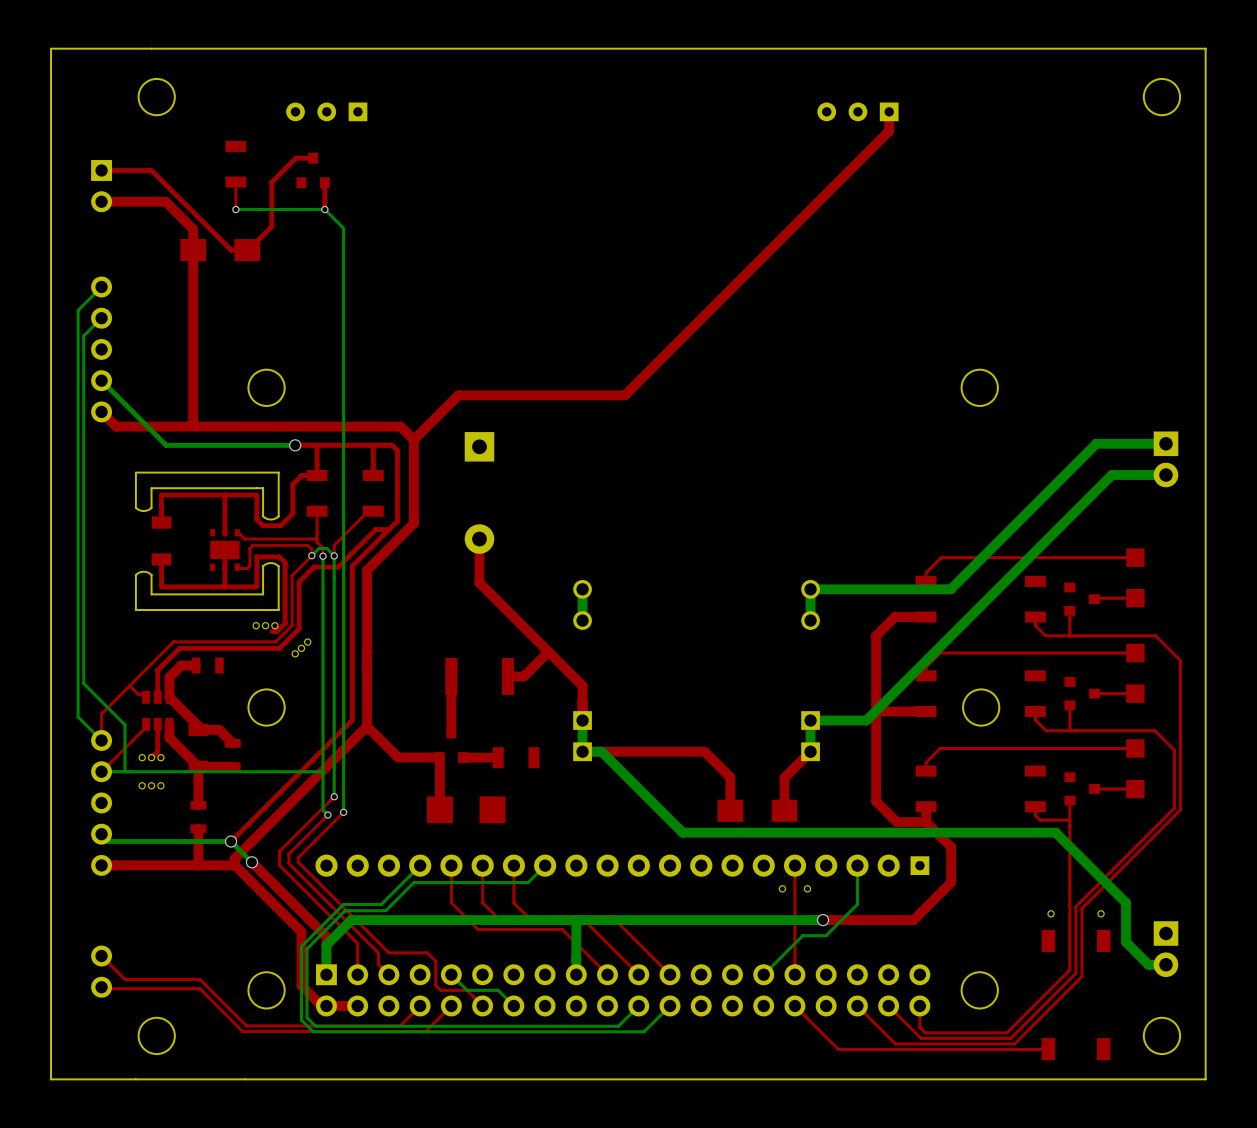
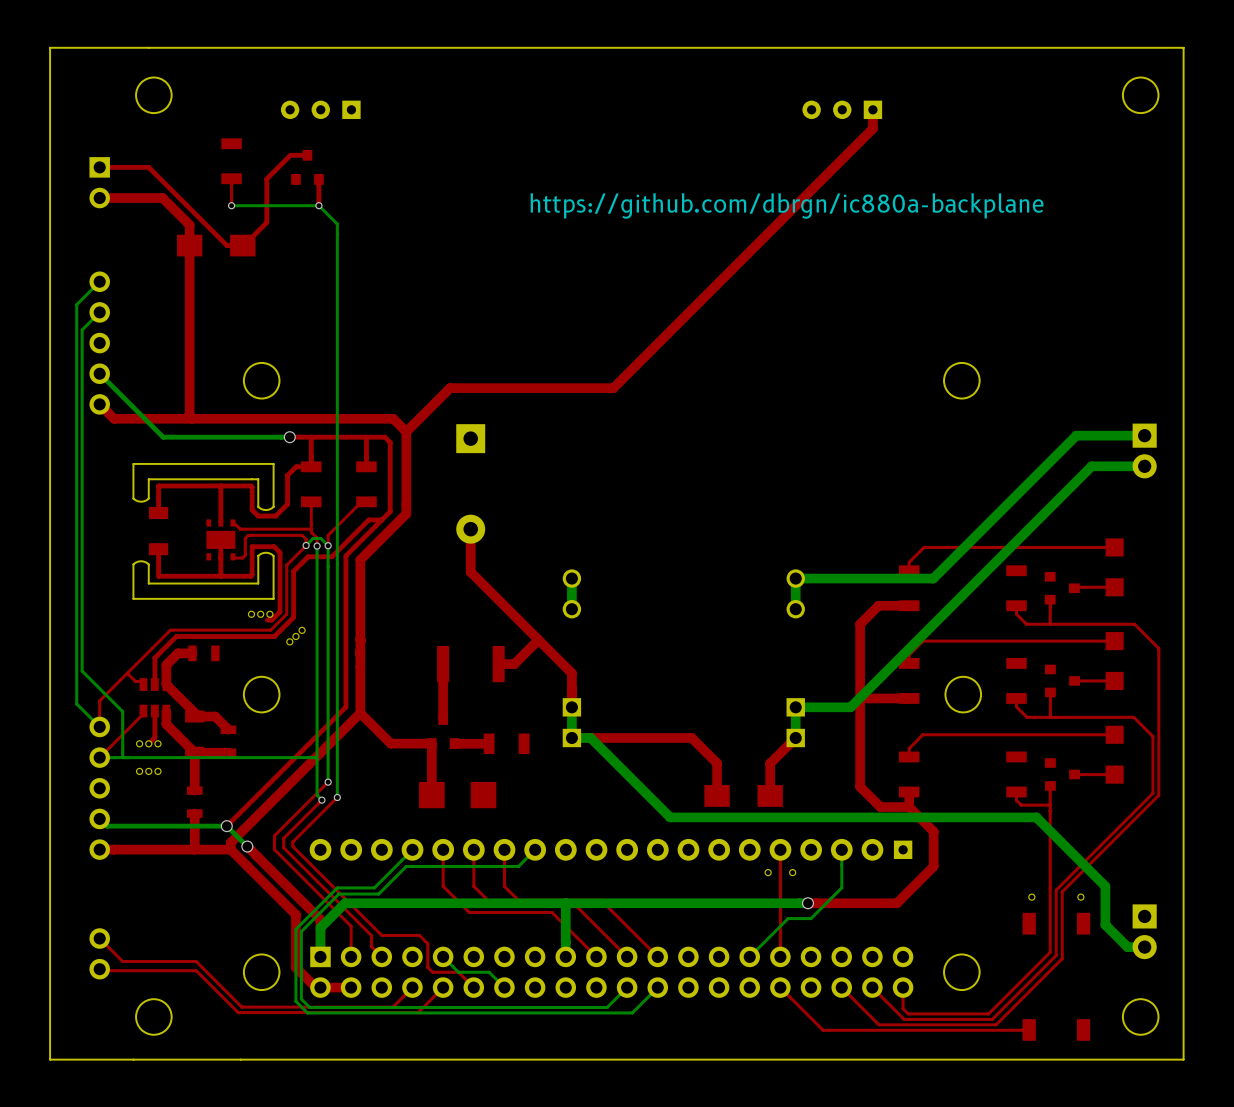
text: none -> https://github.com/dbrgn/ic880a-backplane (786, 205)

